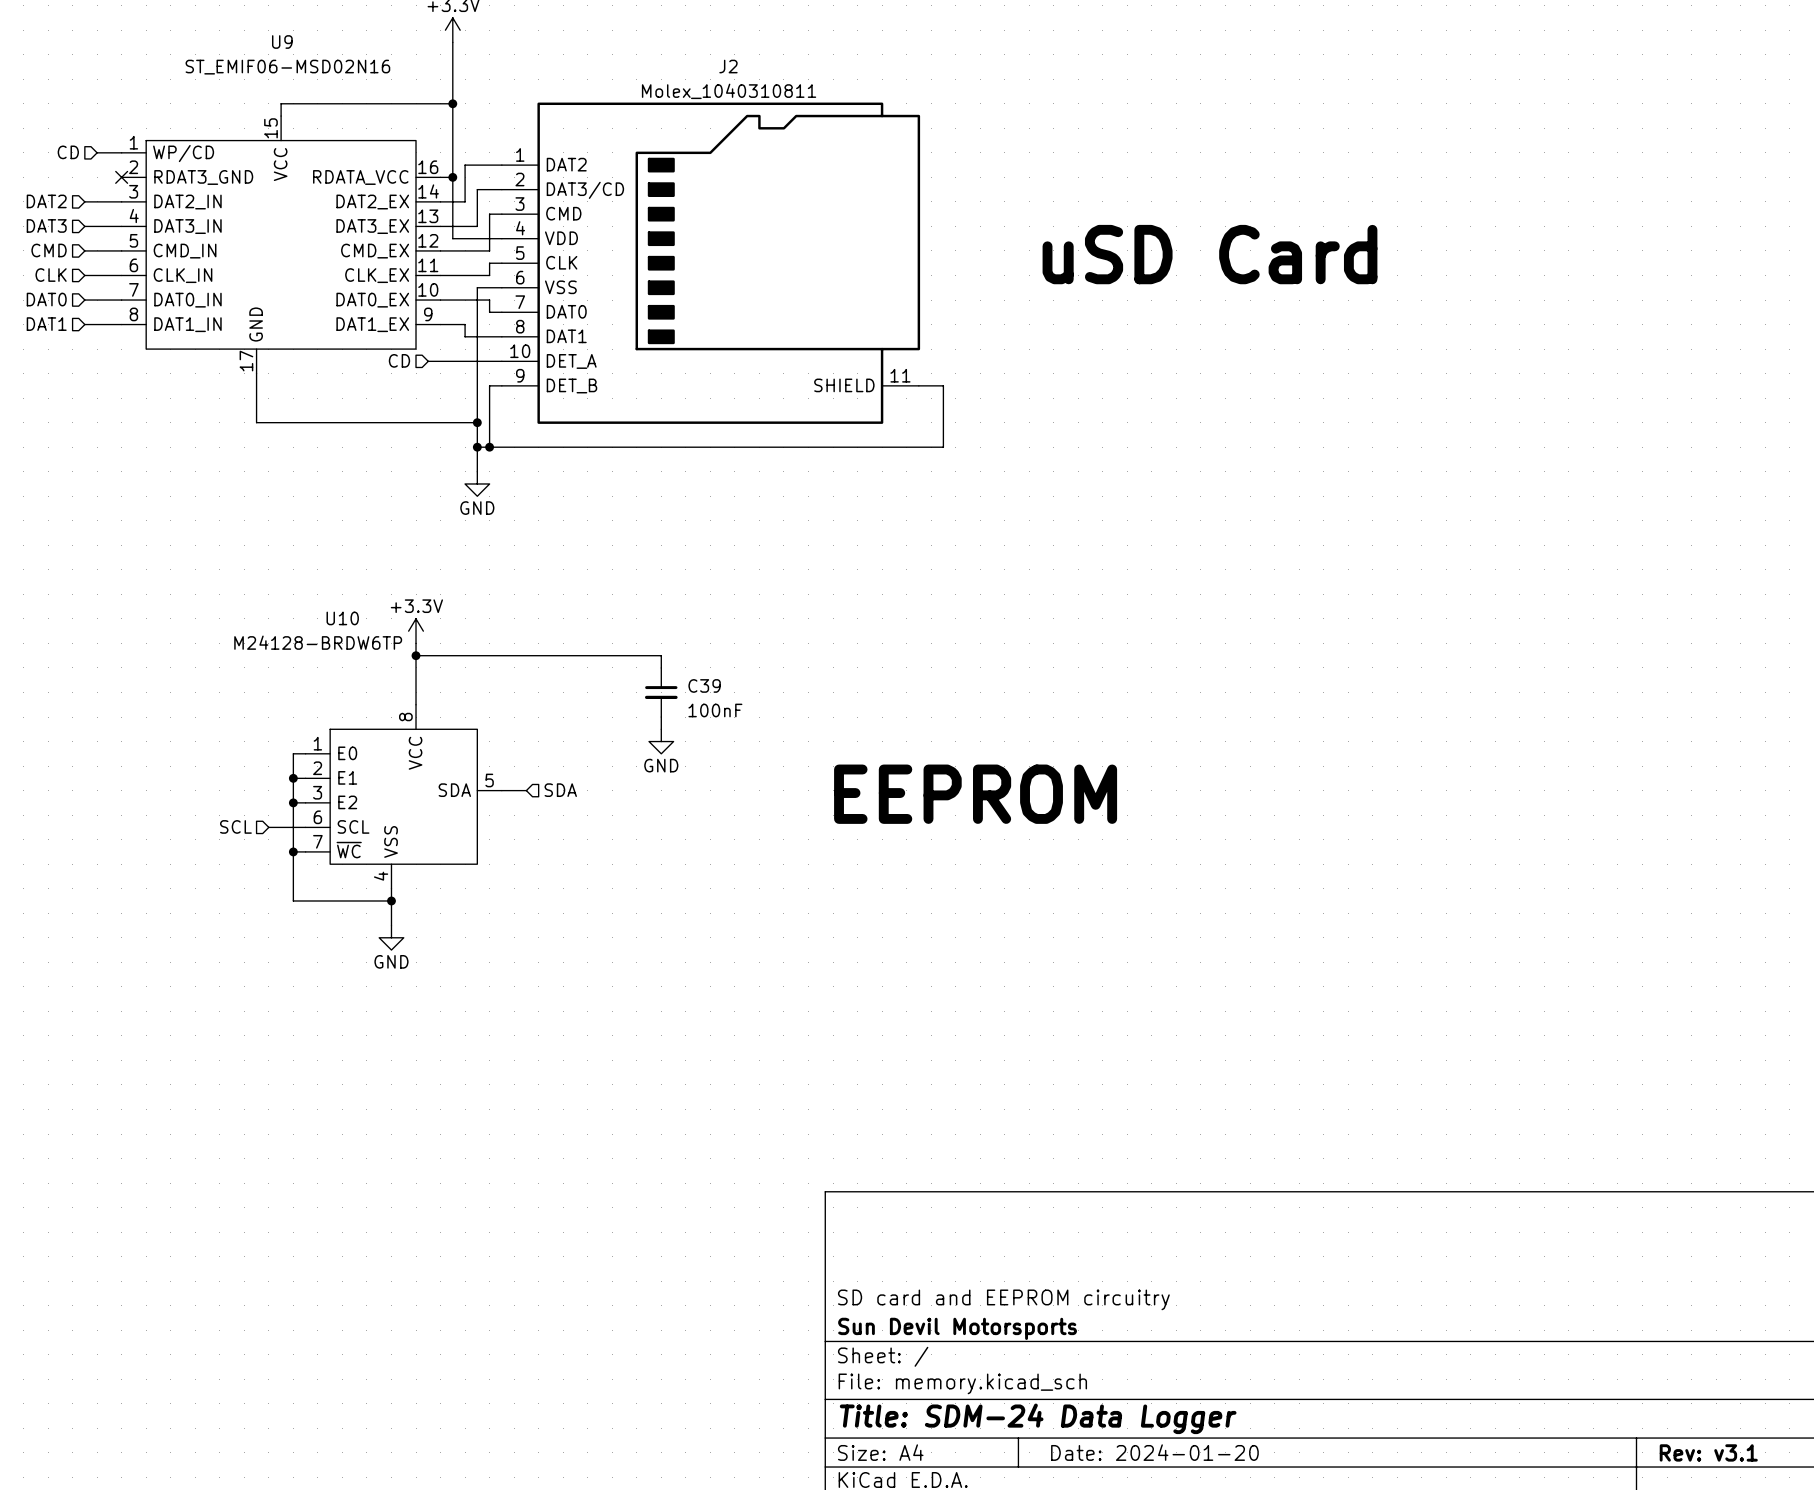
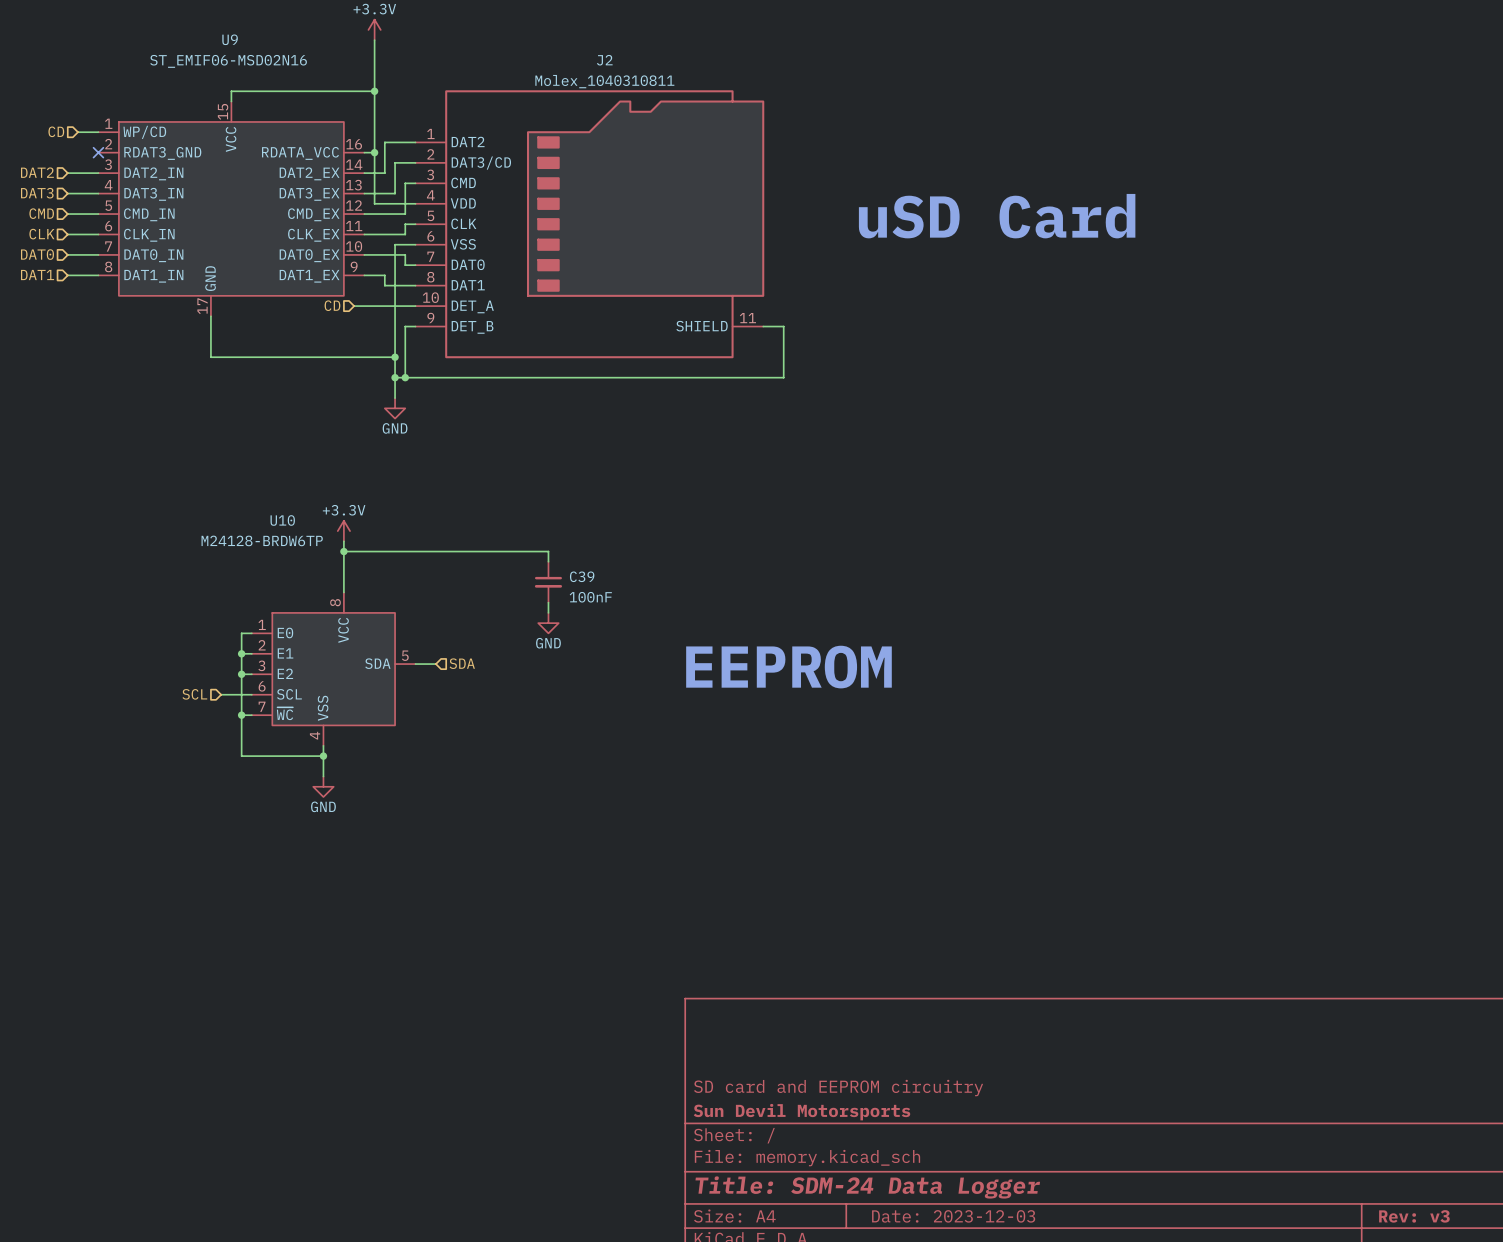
title block: Date: 2024-01-20 (1154, 1452) -> Date: 2023-12-03 (953, 1216)
title block: Rev: v3.1 (1708, 1452) -> Rev: v3 (1414, 1216)

